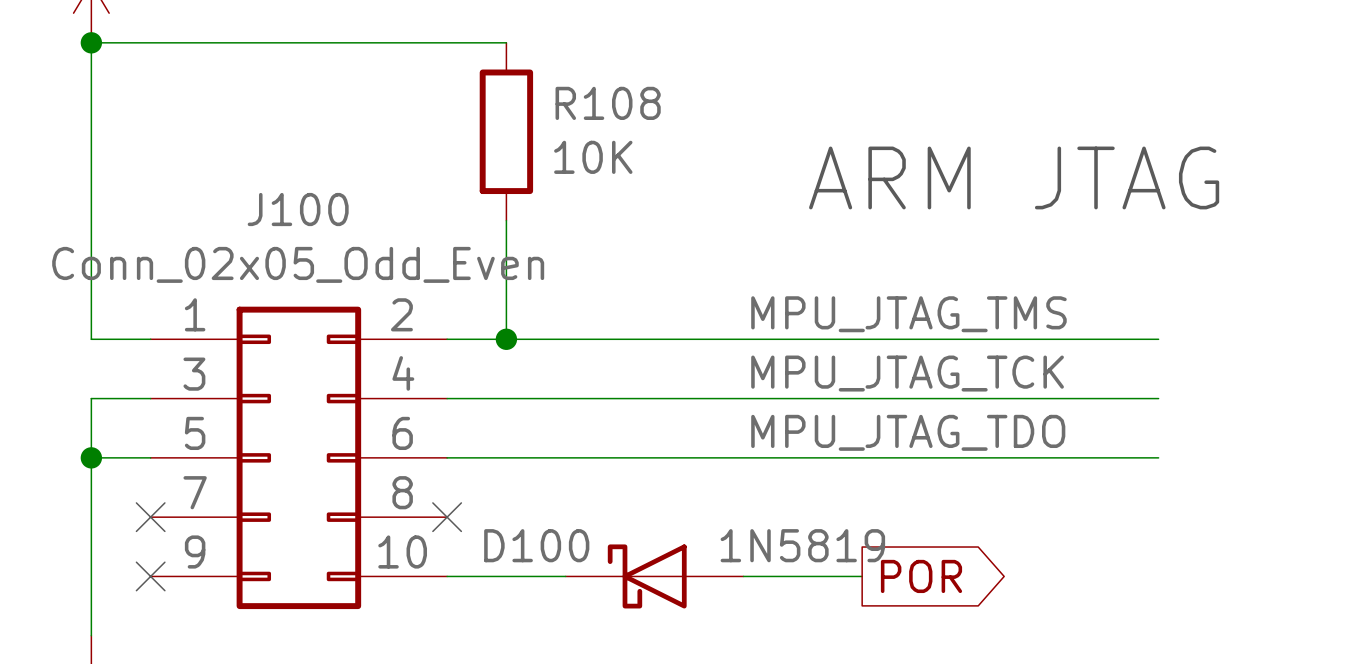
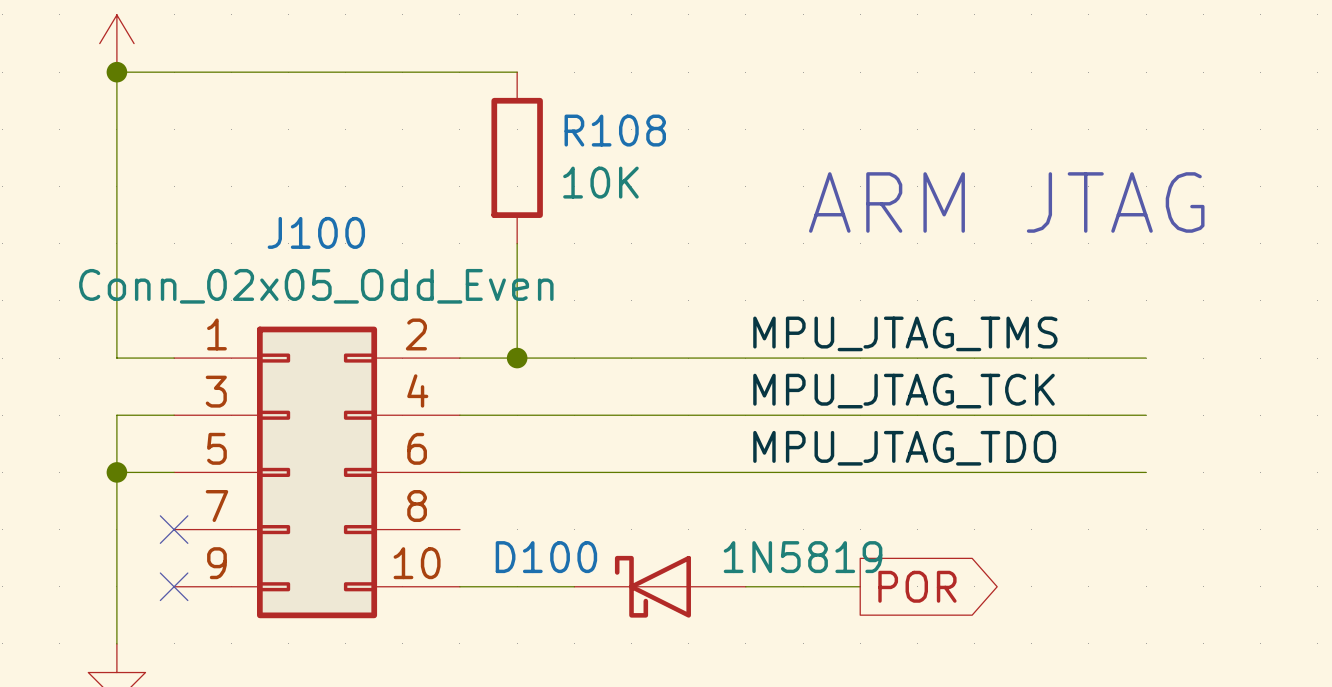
no-connect mark: (447, 517) -> none

